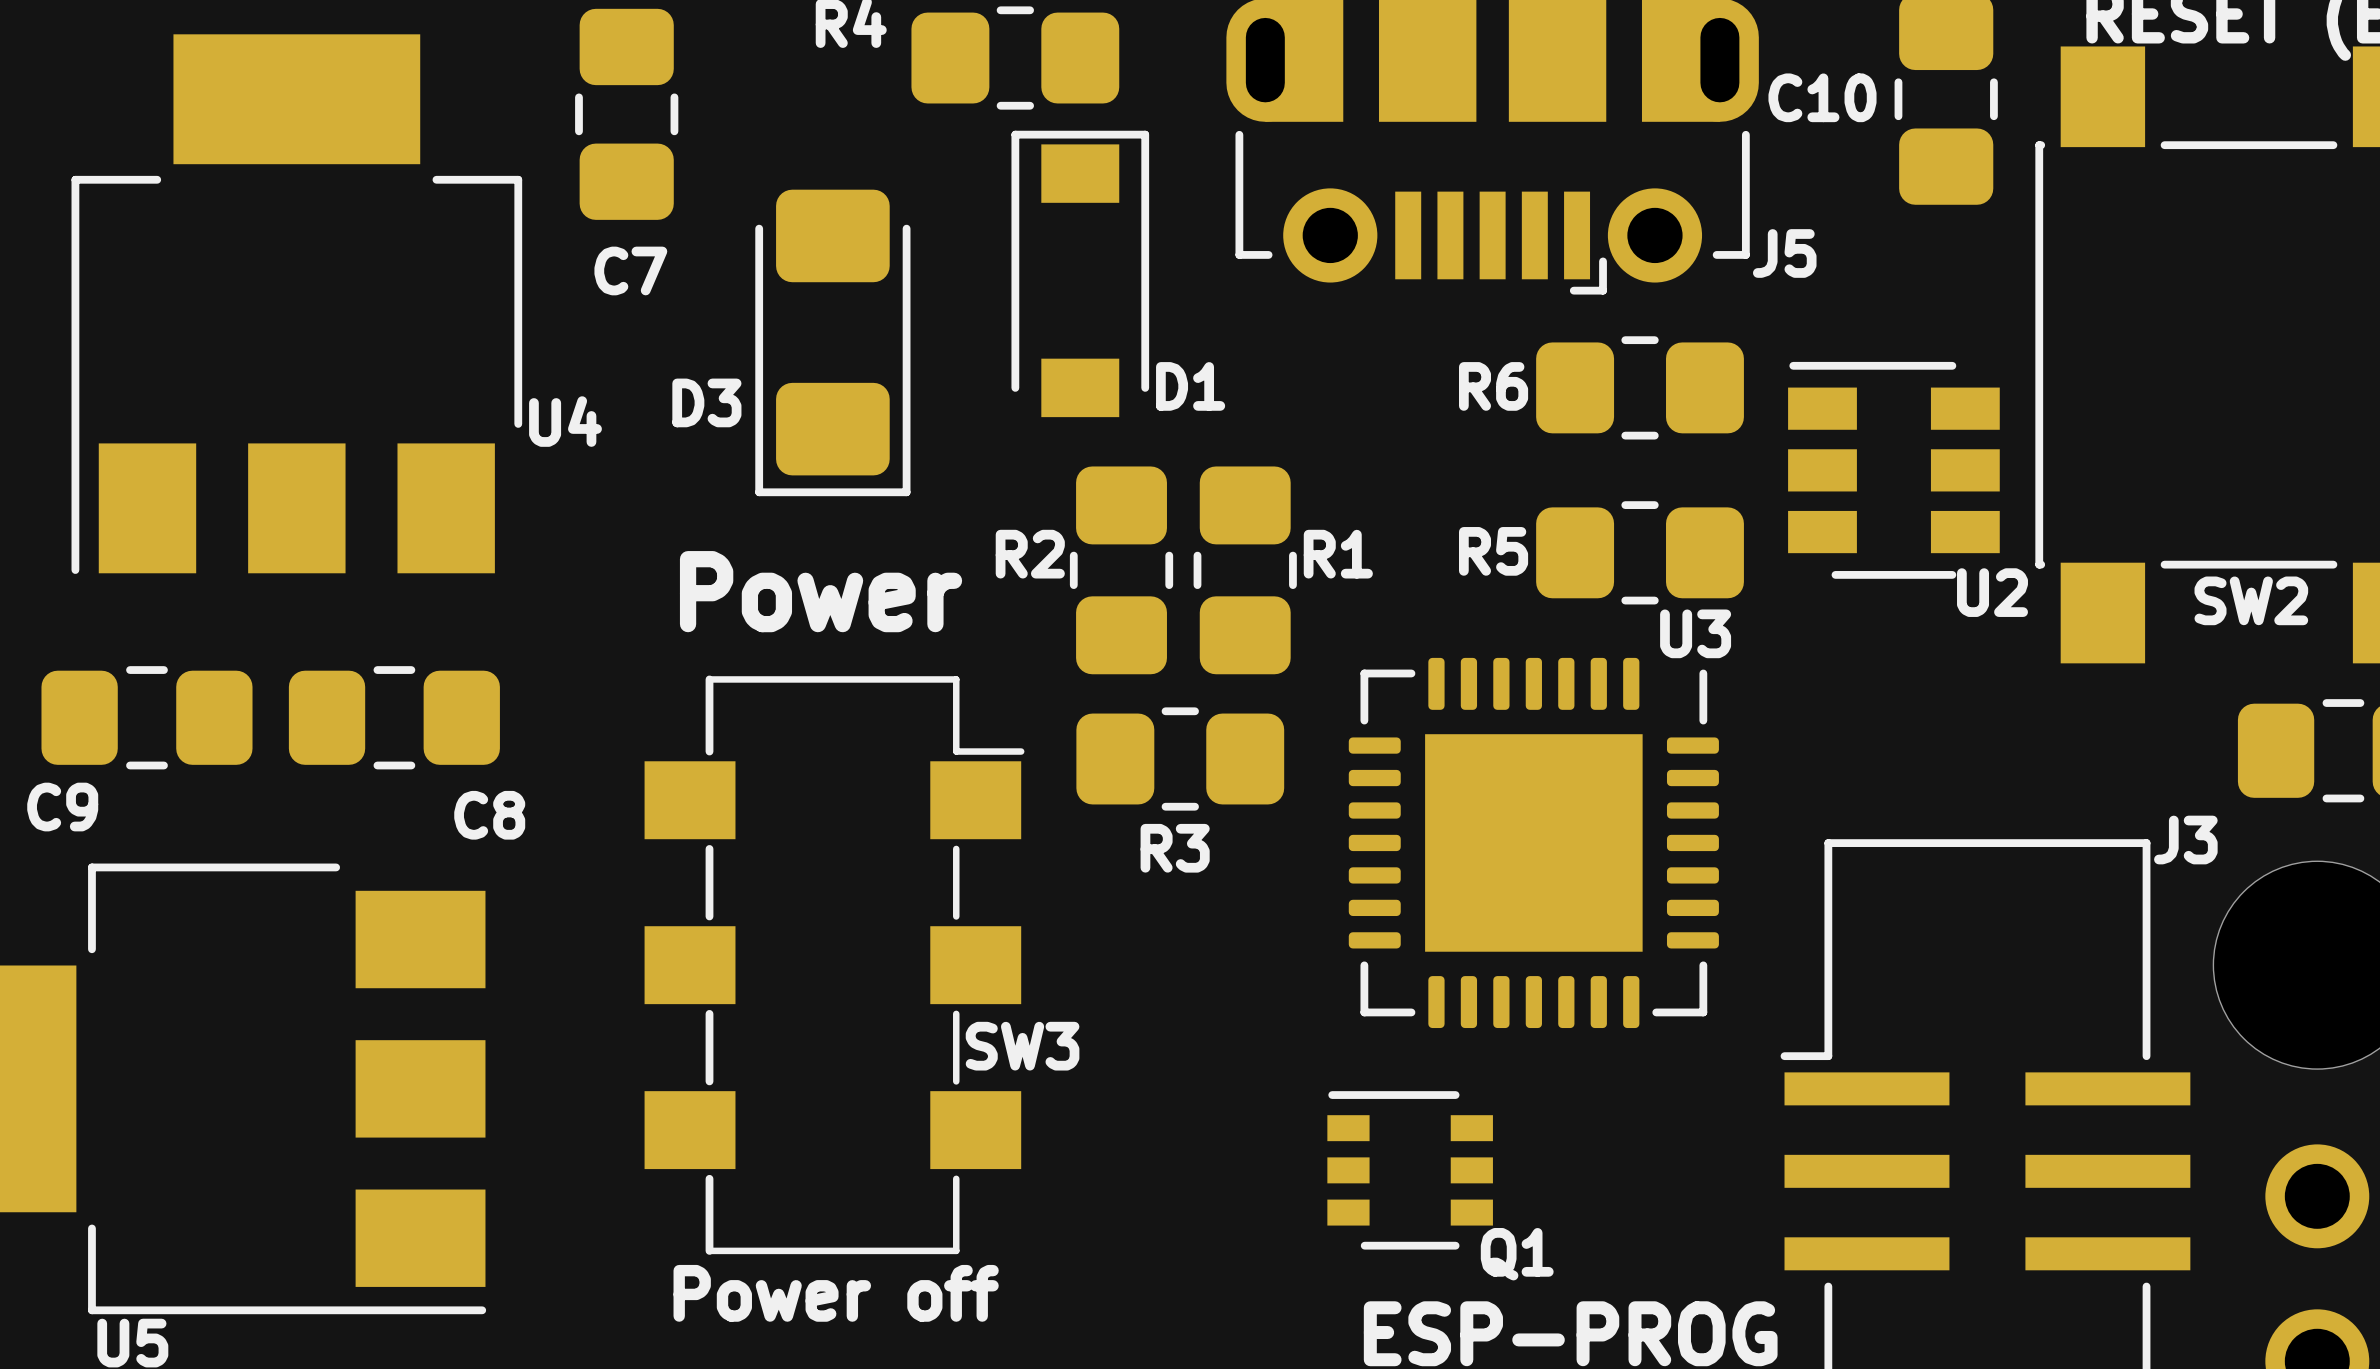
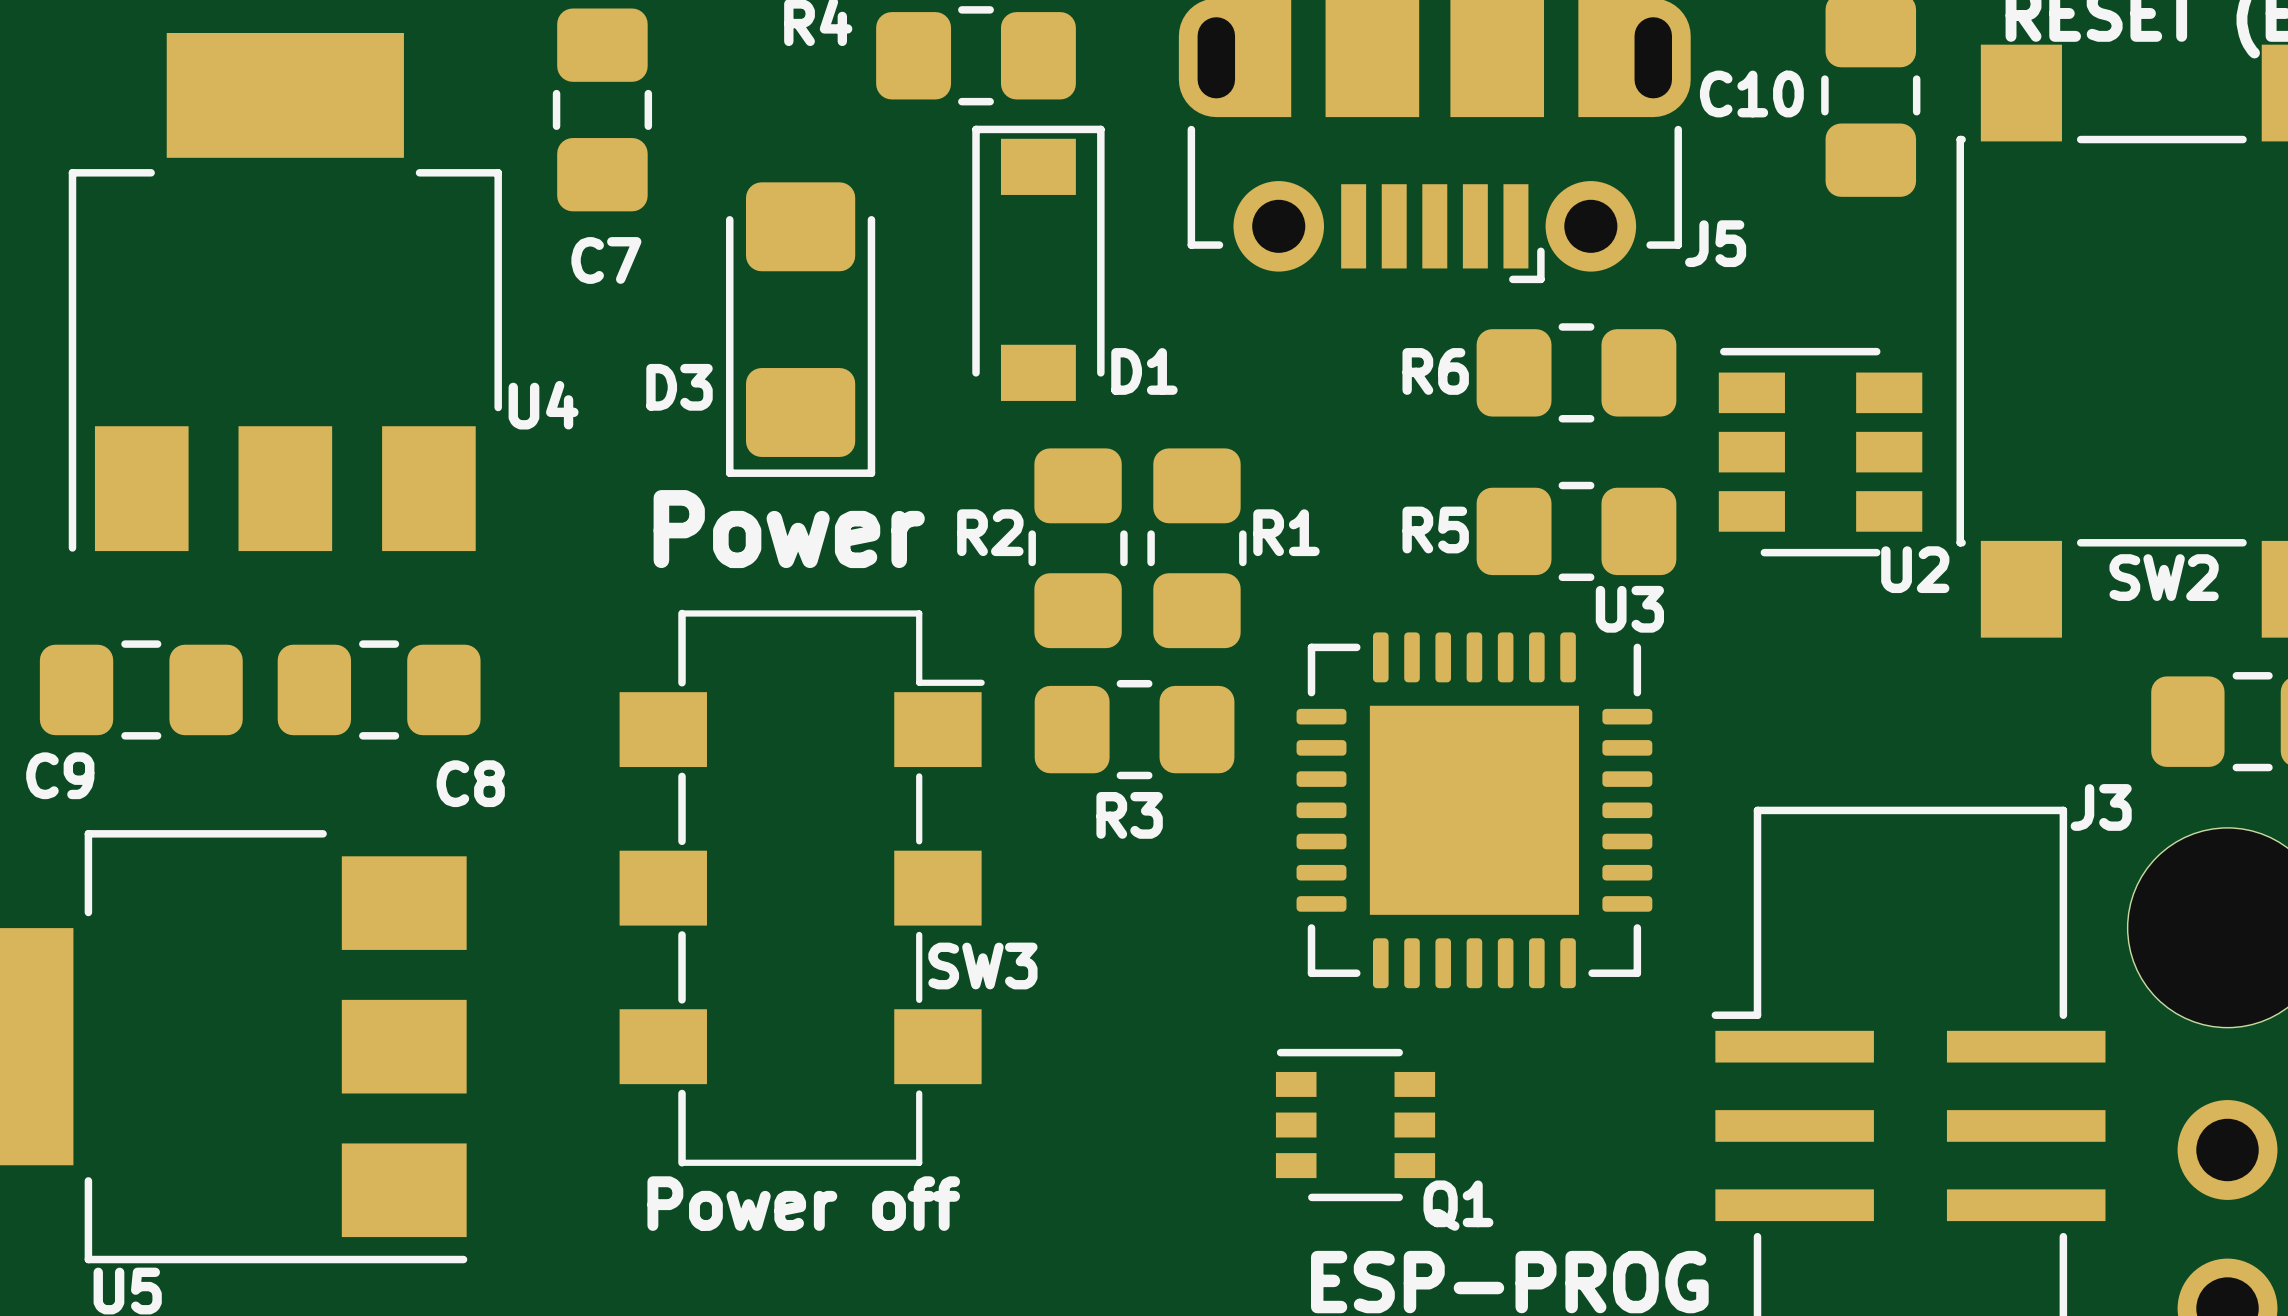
text position: Power (821, 591) -> Power (789, 529)
SW3 position: (834, 965) -> (802, 888)
text position: Power off (836, 1293) -> Power off (803, 1203)

